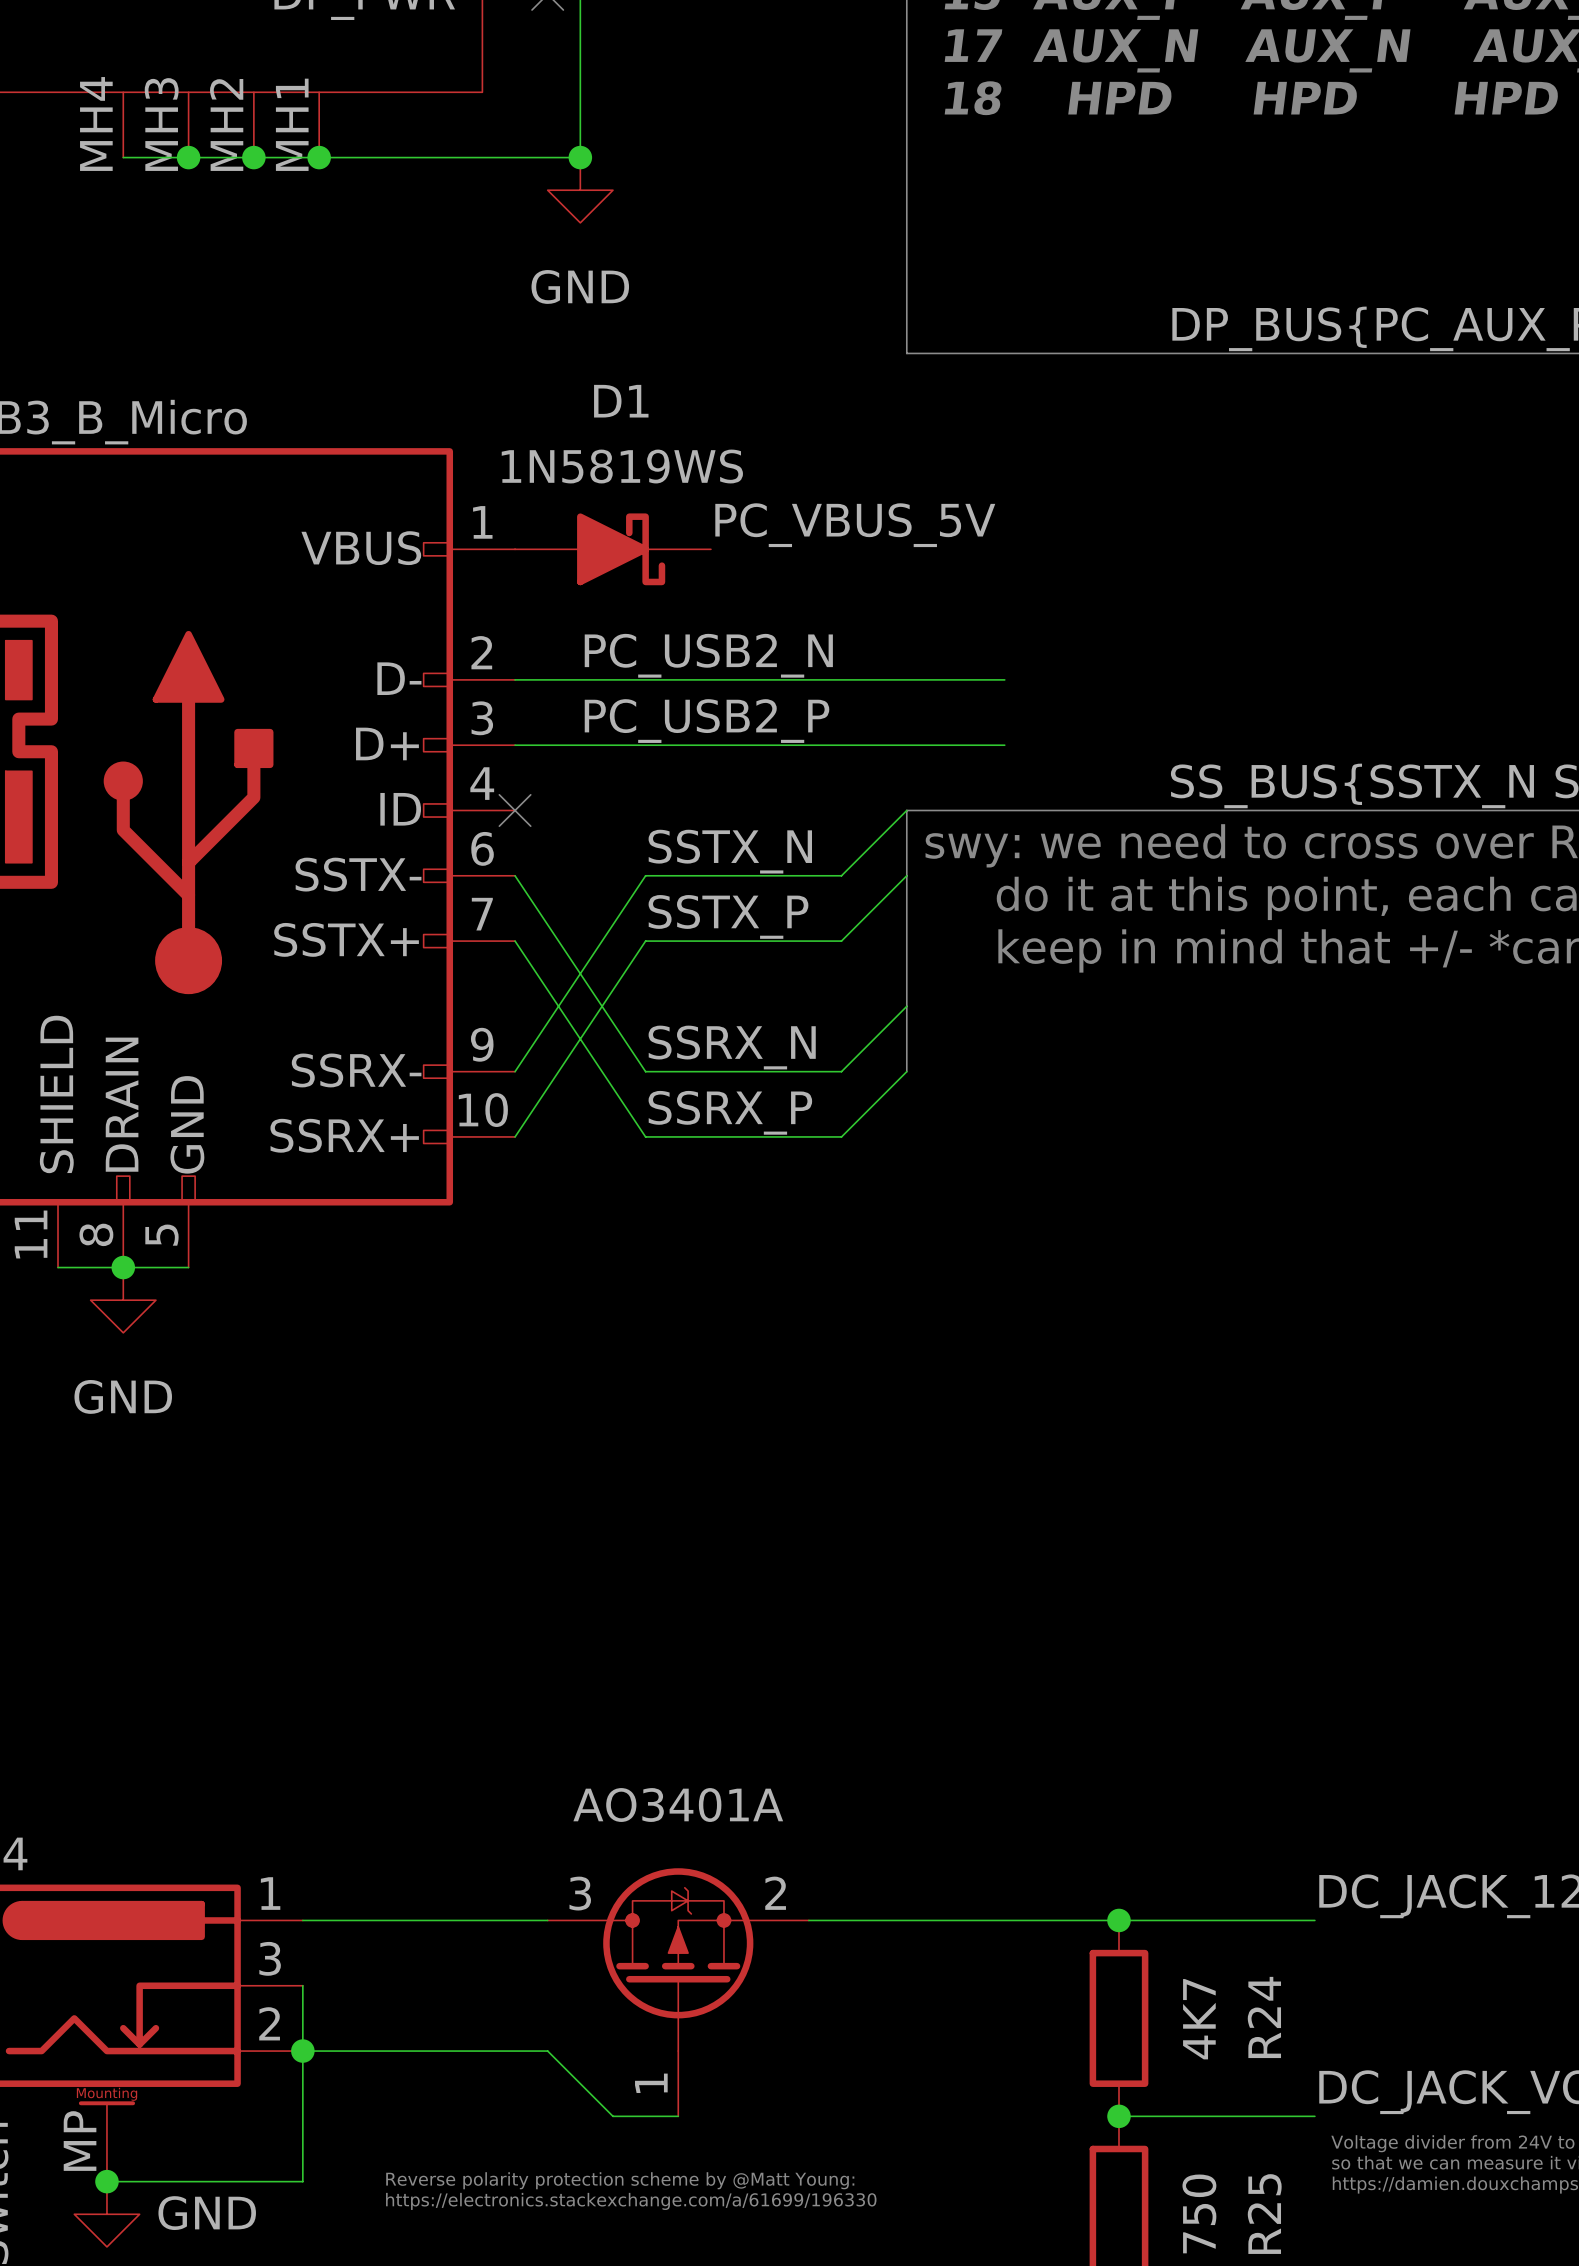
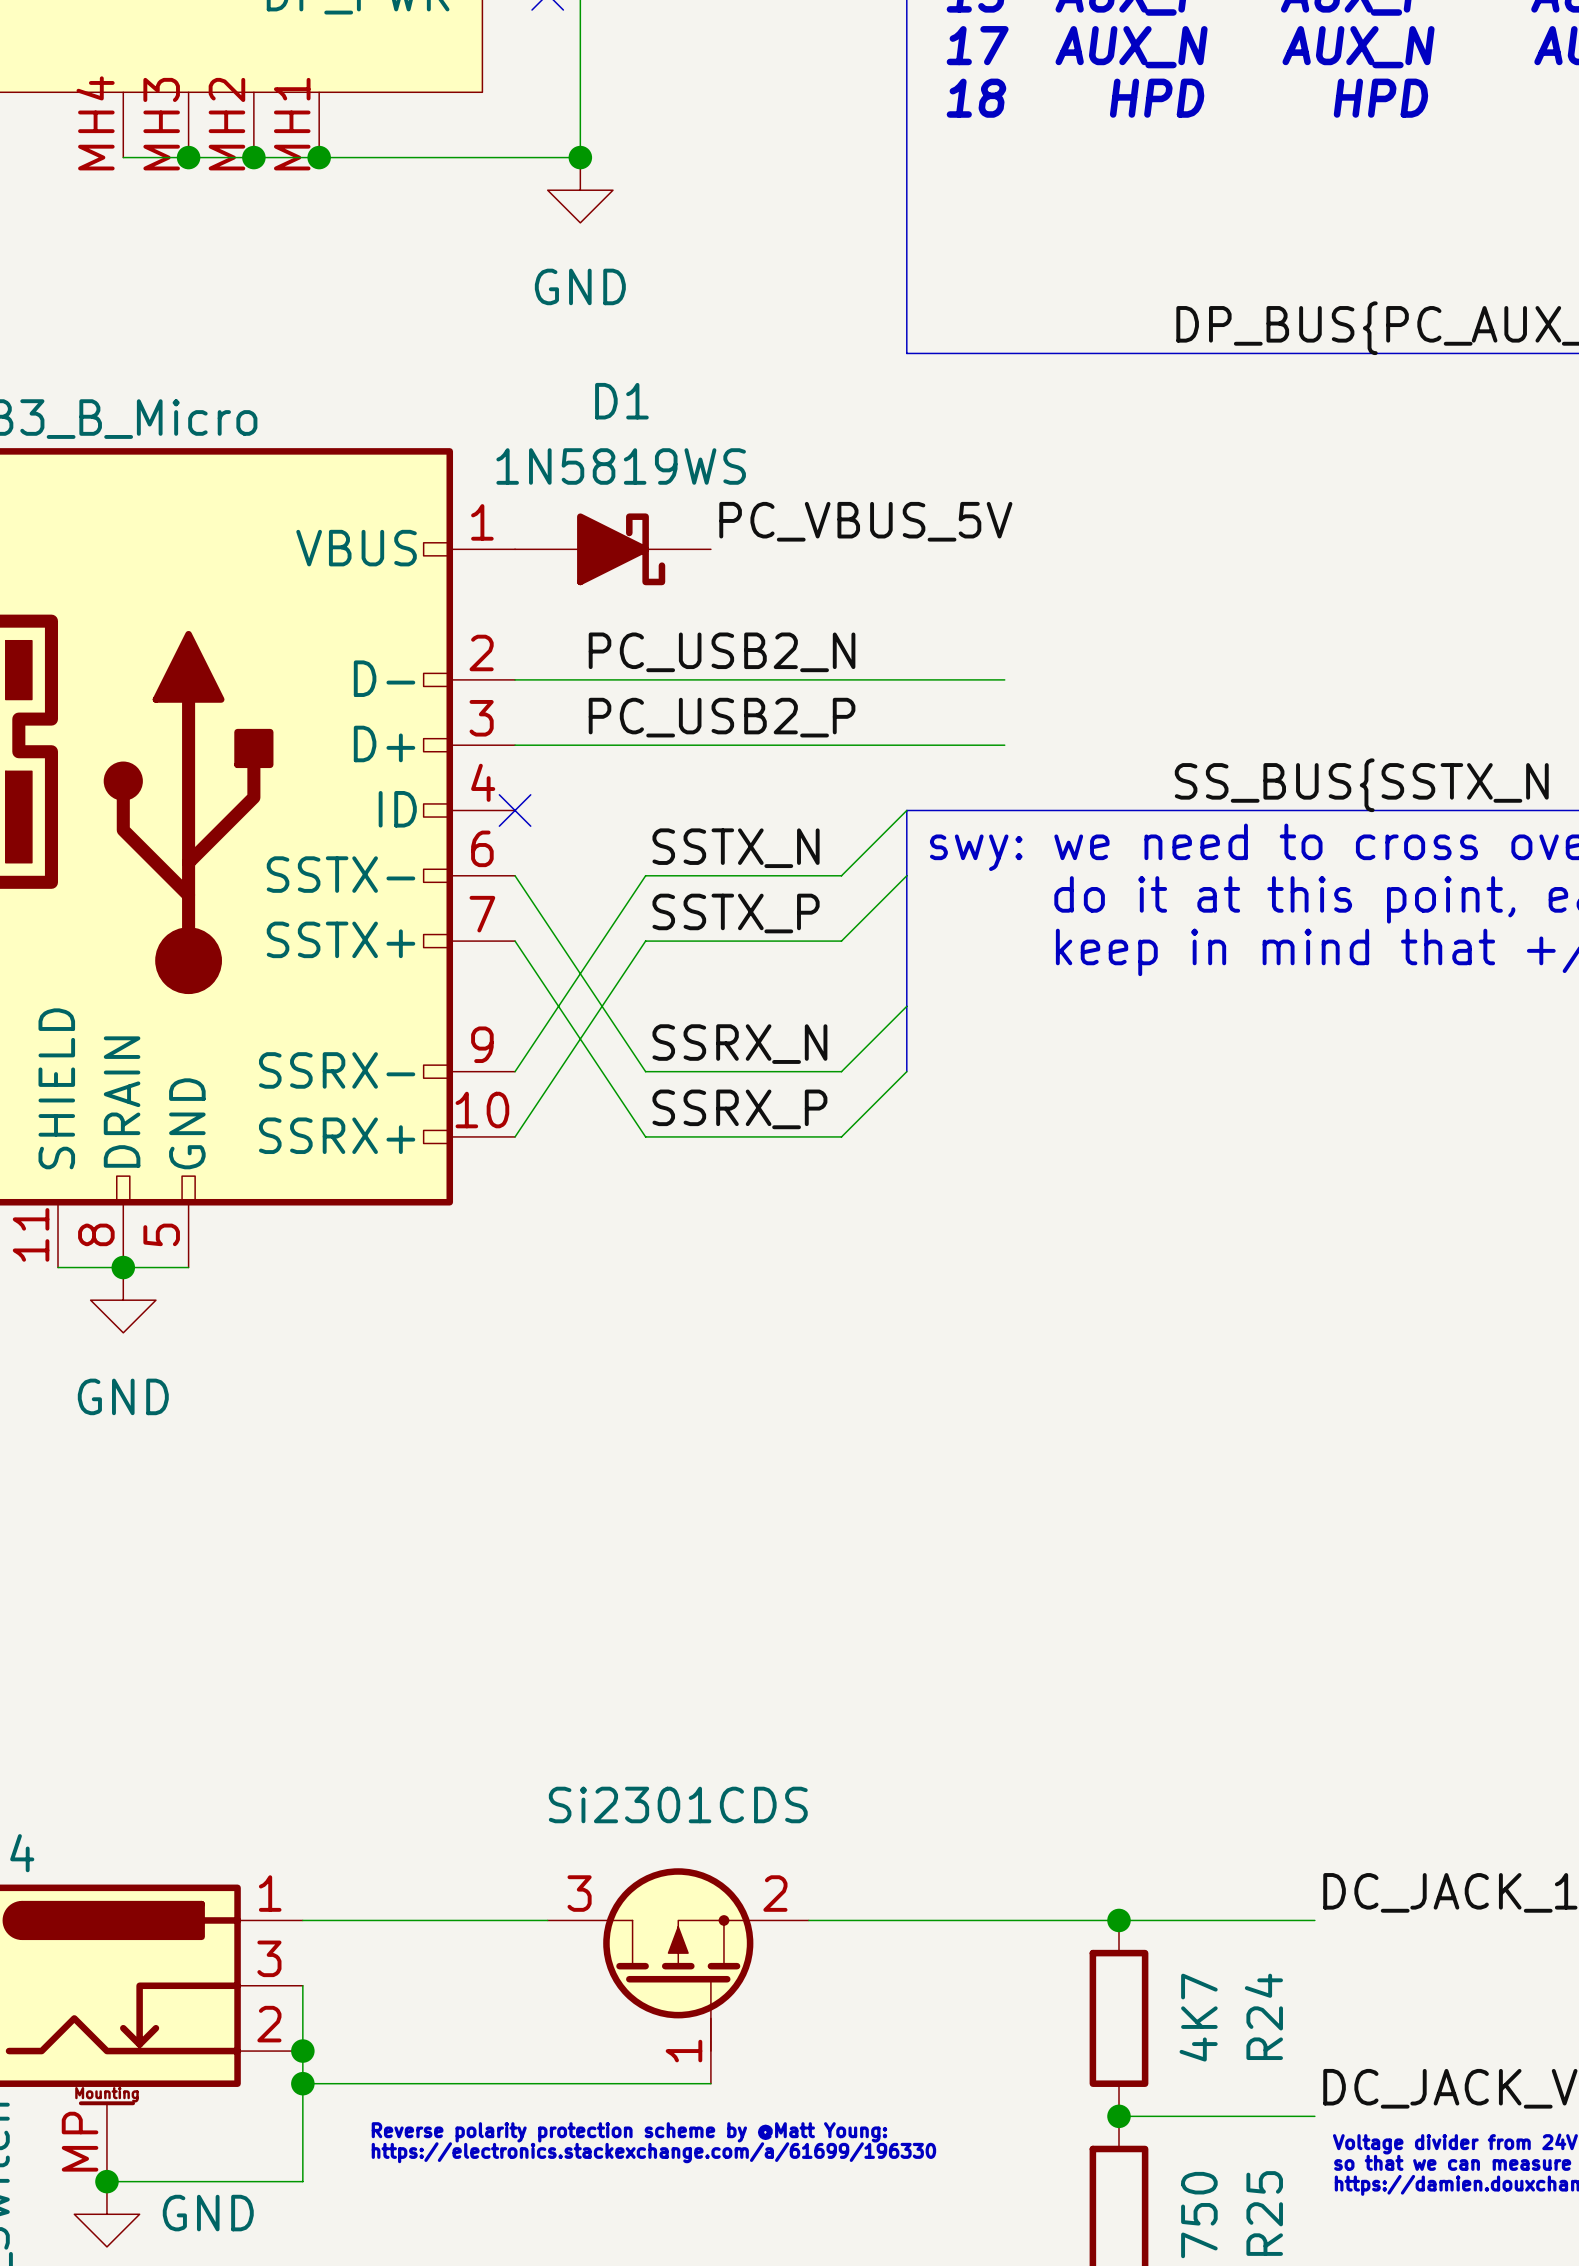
part value: AO3401A (678, 1805) -> Si2301CDS (678, 1804)
part symbol: [547, 1868, 809, 2117] -> [547, 1868, 809, 2084]
wire: (302, 2051) (547, 2051) (612, 2116) (678, 2116) -> none
wire: none -> (302, 2083) (710, 2083)
junction: none -> (302, 2083)
text position: Reverse polarity protection scheme by @Matt Young: (620, 2180) -> Reverse polarity protection scheme by @Matt Young: (629, 2132)
text position: https://electronics.stackexchange.com/a/61699/196330 (631, 2201) -> https://electronics.stackexchange.com/a/61699/196330 (653, 2152)

